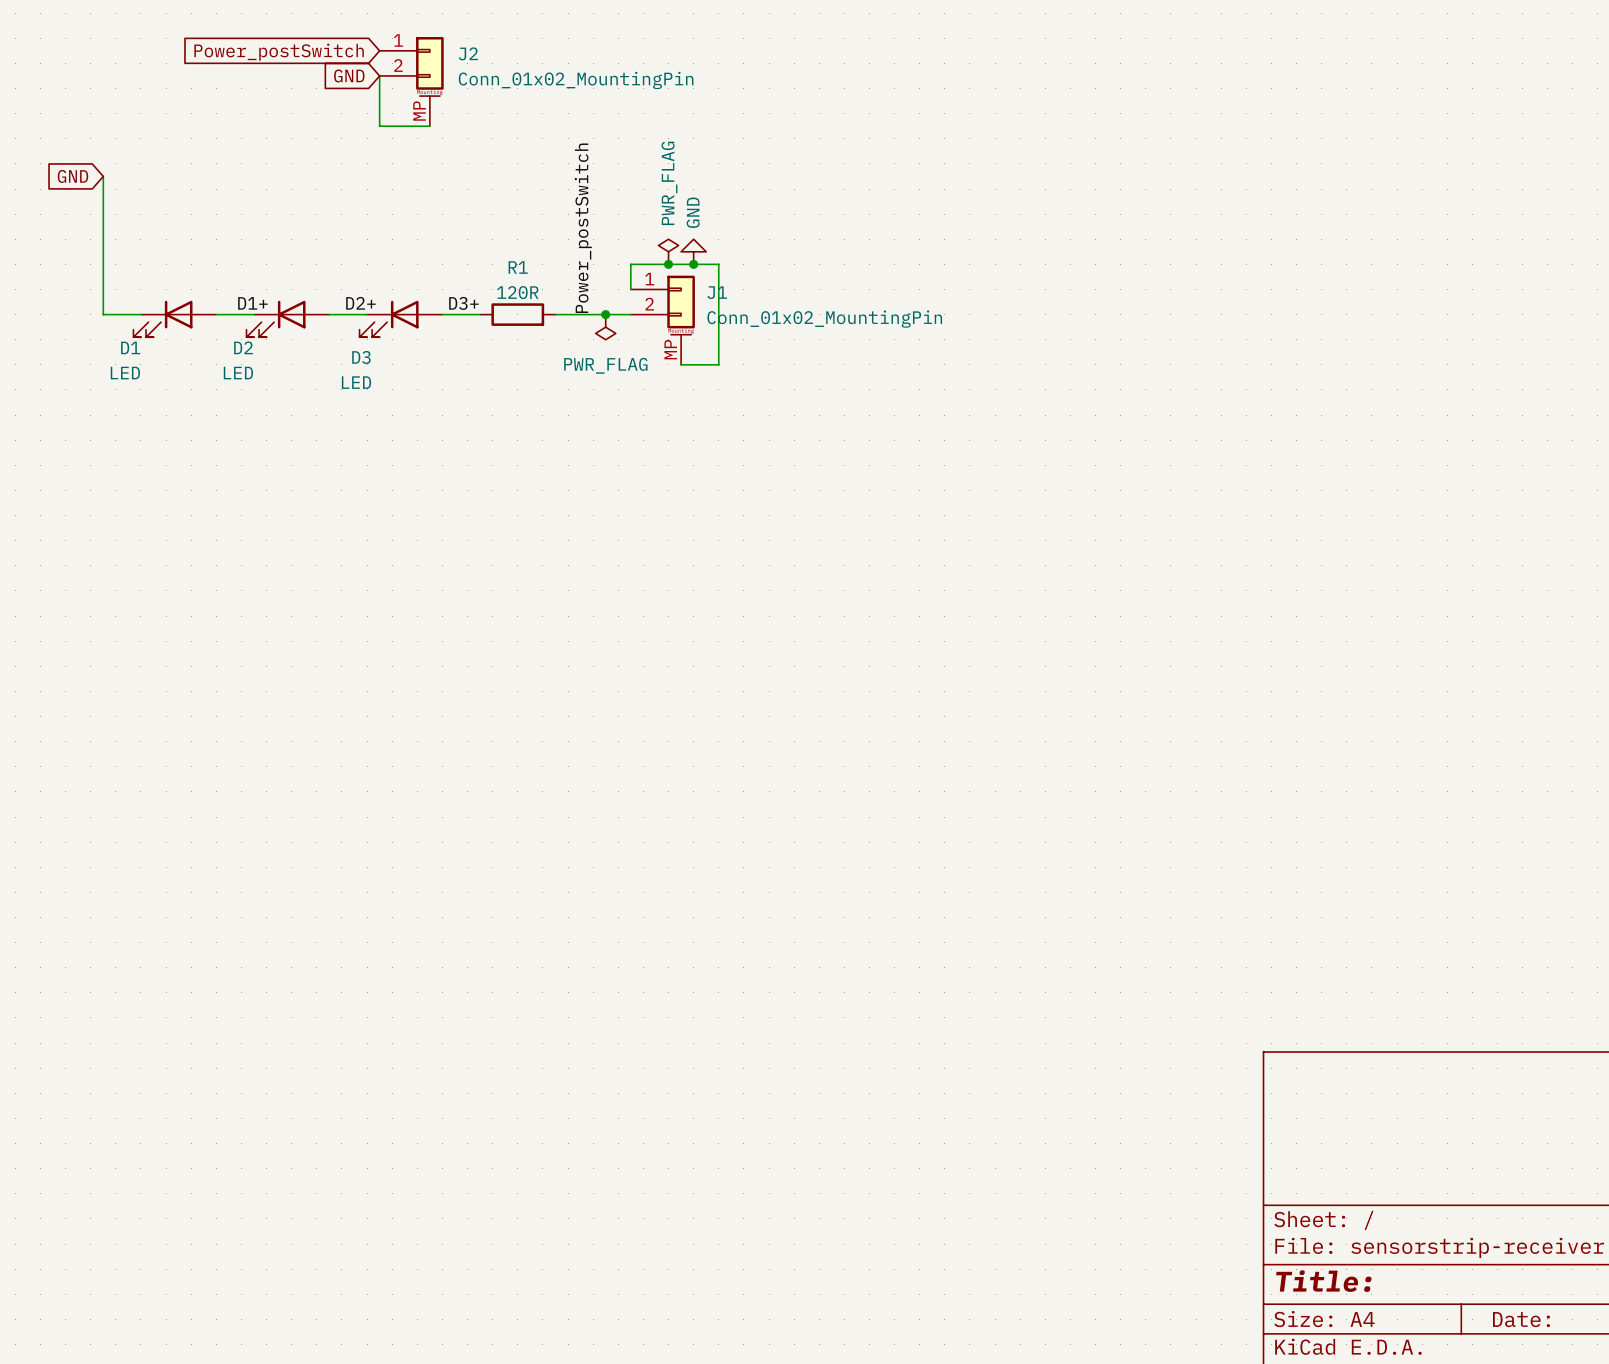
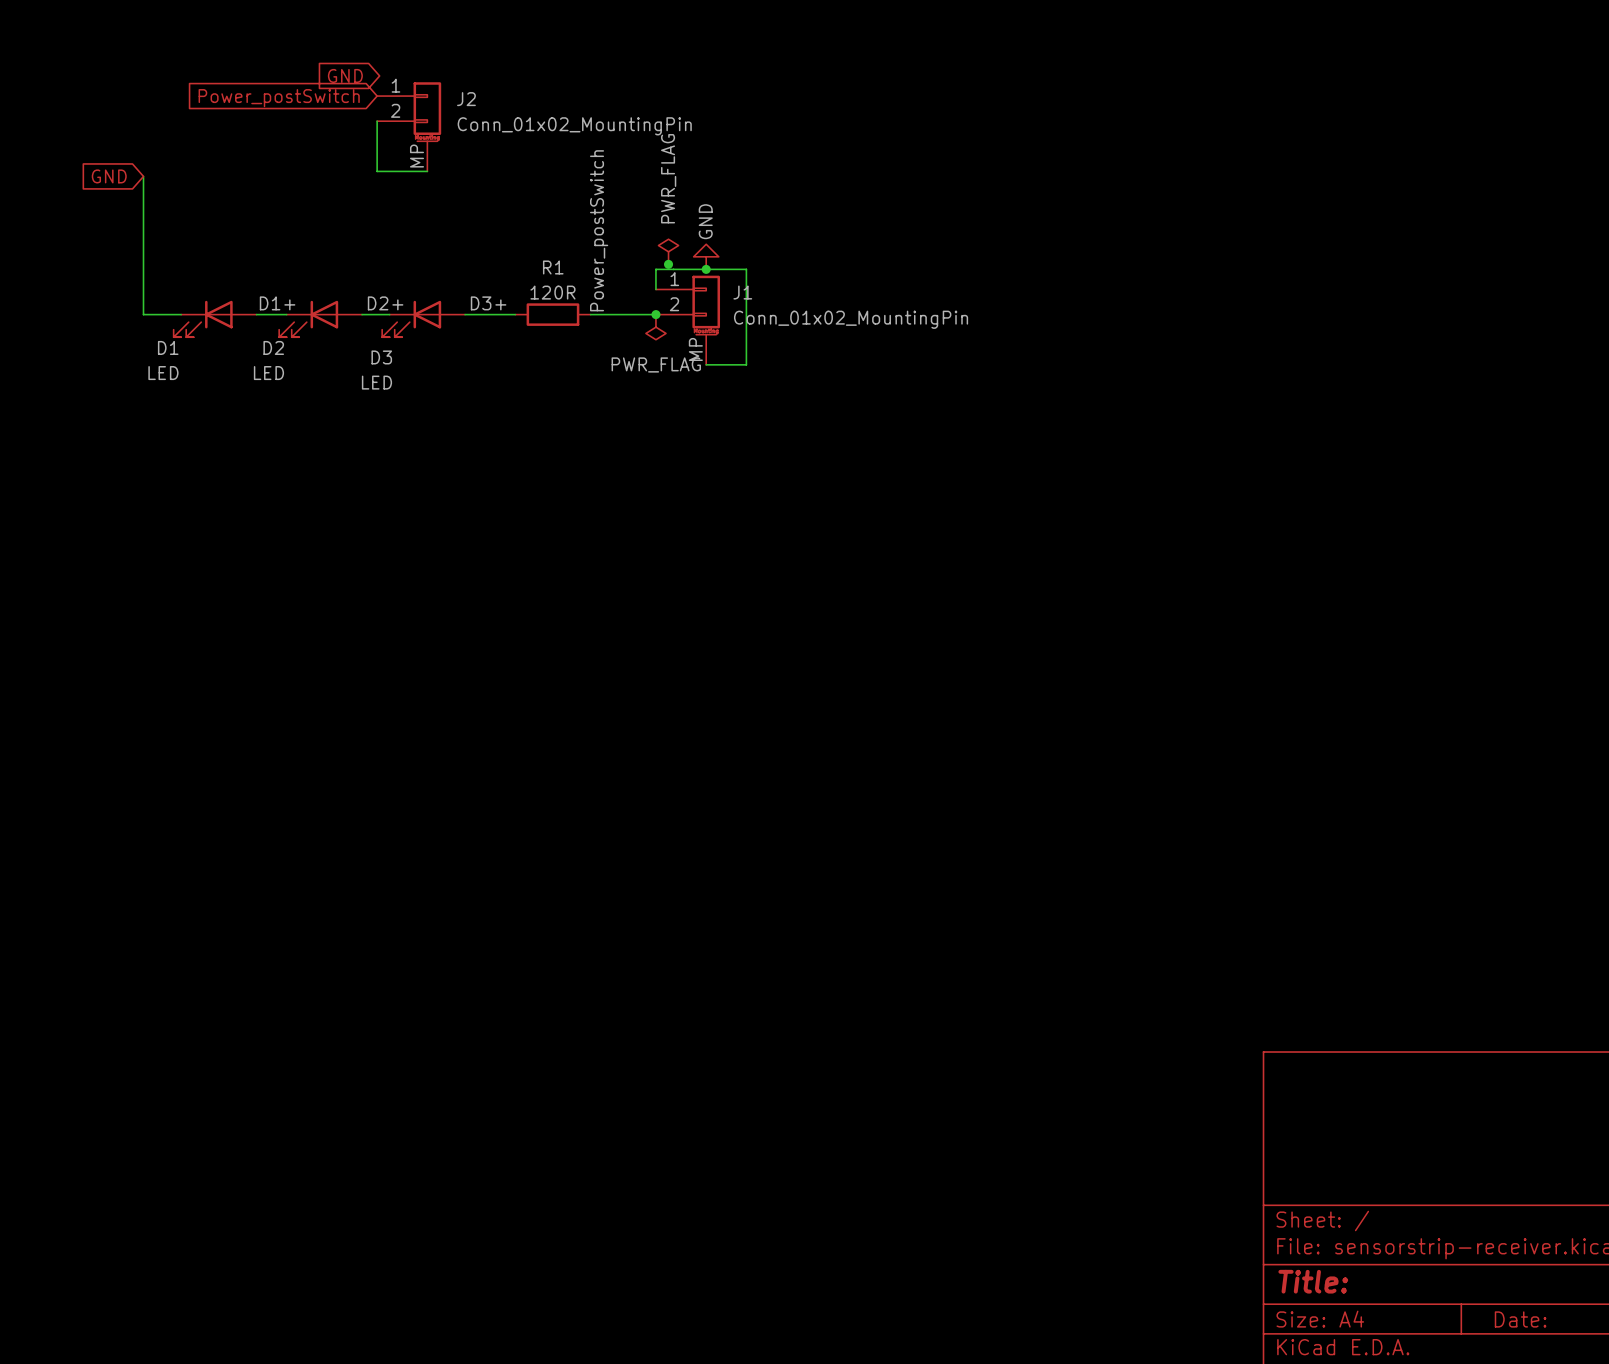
global label position: Power_postSwitch (279, 52) -> Power_postSwitch (279, 98)
wire: (379, 75) (379, 126) (429, 126) -> (377, 121) (377, 171) (427, 171)
J2 position: (411, 81) -> (409, 126)
global label position: GND (72, 176) -> GND (109, 176)
wire: (103, 176) (103, 314) (140, 314) -> (143, 176) (143, 314) (181, 314)
label position: Power_postSwitch (583, 228) -> Power_postSwitch (599, 230)
power symbol position: GND (693, 251) -> GND (706, 256)
junction position: (693, 264) -> (706, 269)
wire: (630, 289) (630, 264) (718, 264) (718, 364) -> (655, 289) (655, 269) (746, 269) (746, 364) (718, 364)
label position: D1+ (252, 303) -> D1+ (277, 303)
label position: D2+ (360, 303) -> D2+ (385, 303)
label position: D3+ (463, 303) -> D3+ (488, 303)
R1 position: (517, 314) -> (552, 314)
wire: (555, 314) (590, 314) -> (480, 314) (515, 314)
junction: (605, 314) -> none
junction: none -> (655, 314)
D1 position: (174, 319) -> (215, 319)
D2 position: (287, 319) -> (320, 319)
D3 position: (400, 319) -> (423, 319)
J1 position: (662, 320) -> (687, 320)
power symbol position: PWR_FLAG (605, 327) -> PWR_FLAG (655, 327)

